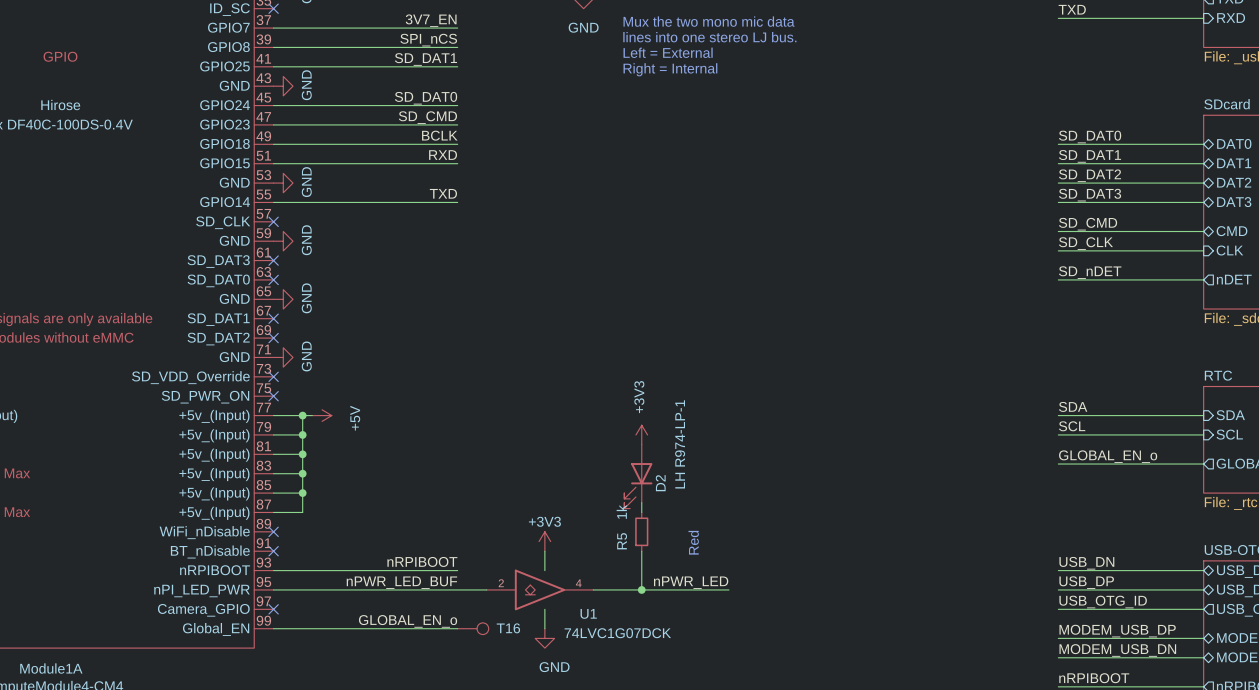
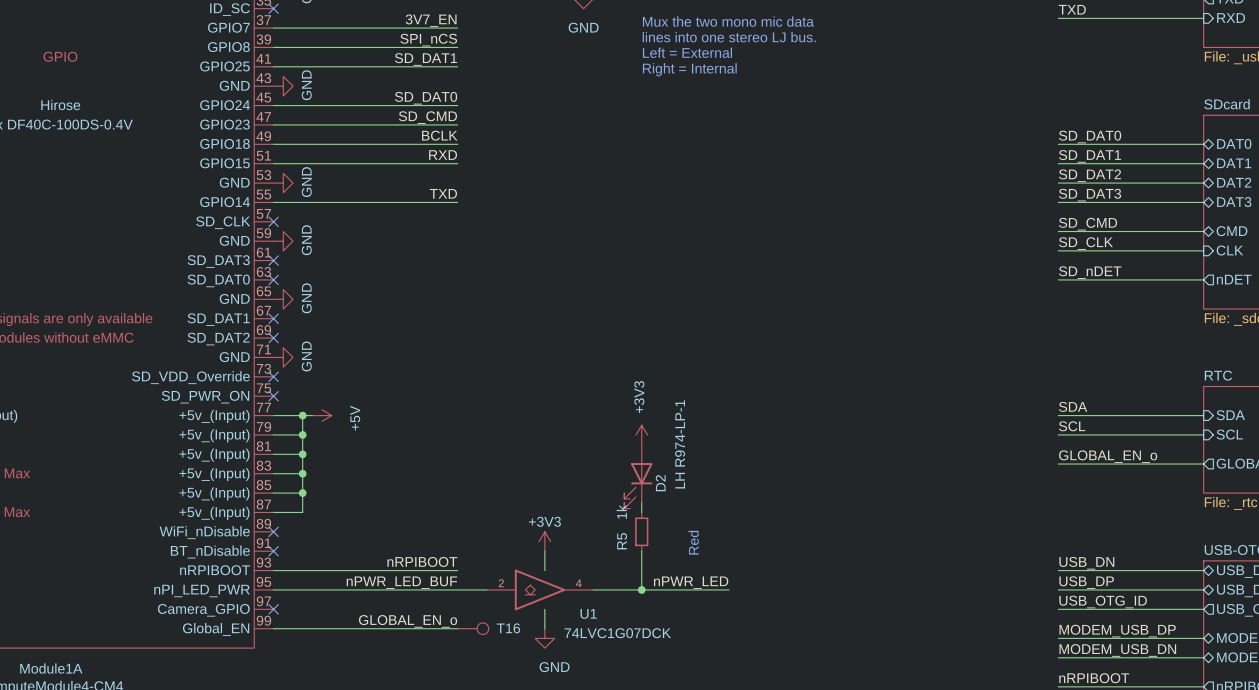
text position: Mux the two mono mic data (709, 21) -> Mux the two mono mic data (728, 21)
text position: lines into one stereo LJ bus. (709, 37) -> lines into one stereo LJ bus. (729, 37)
text position: Left = External (668, 52) -> Left = External (687, 52)
text position: Right = Internal (670, 69) -> Right = Internal (689, 69)

